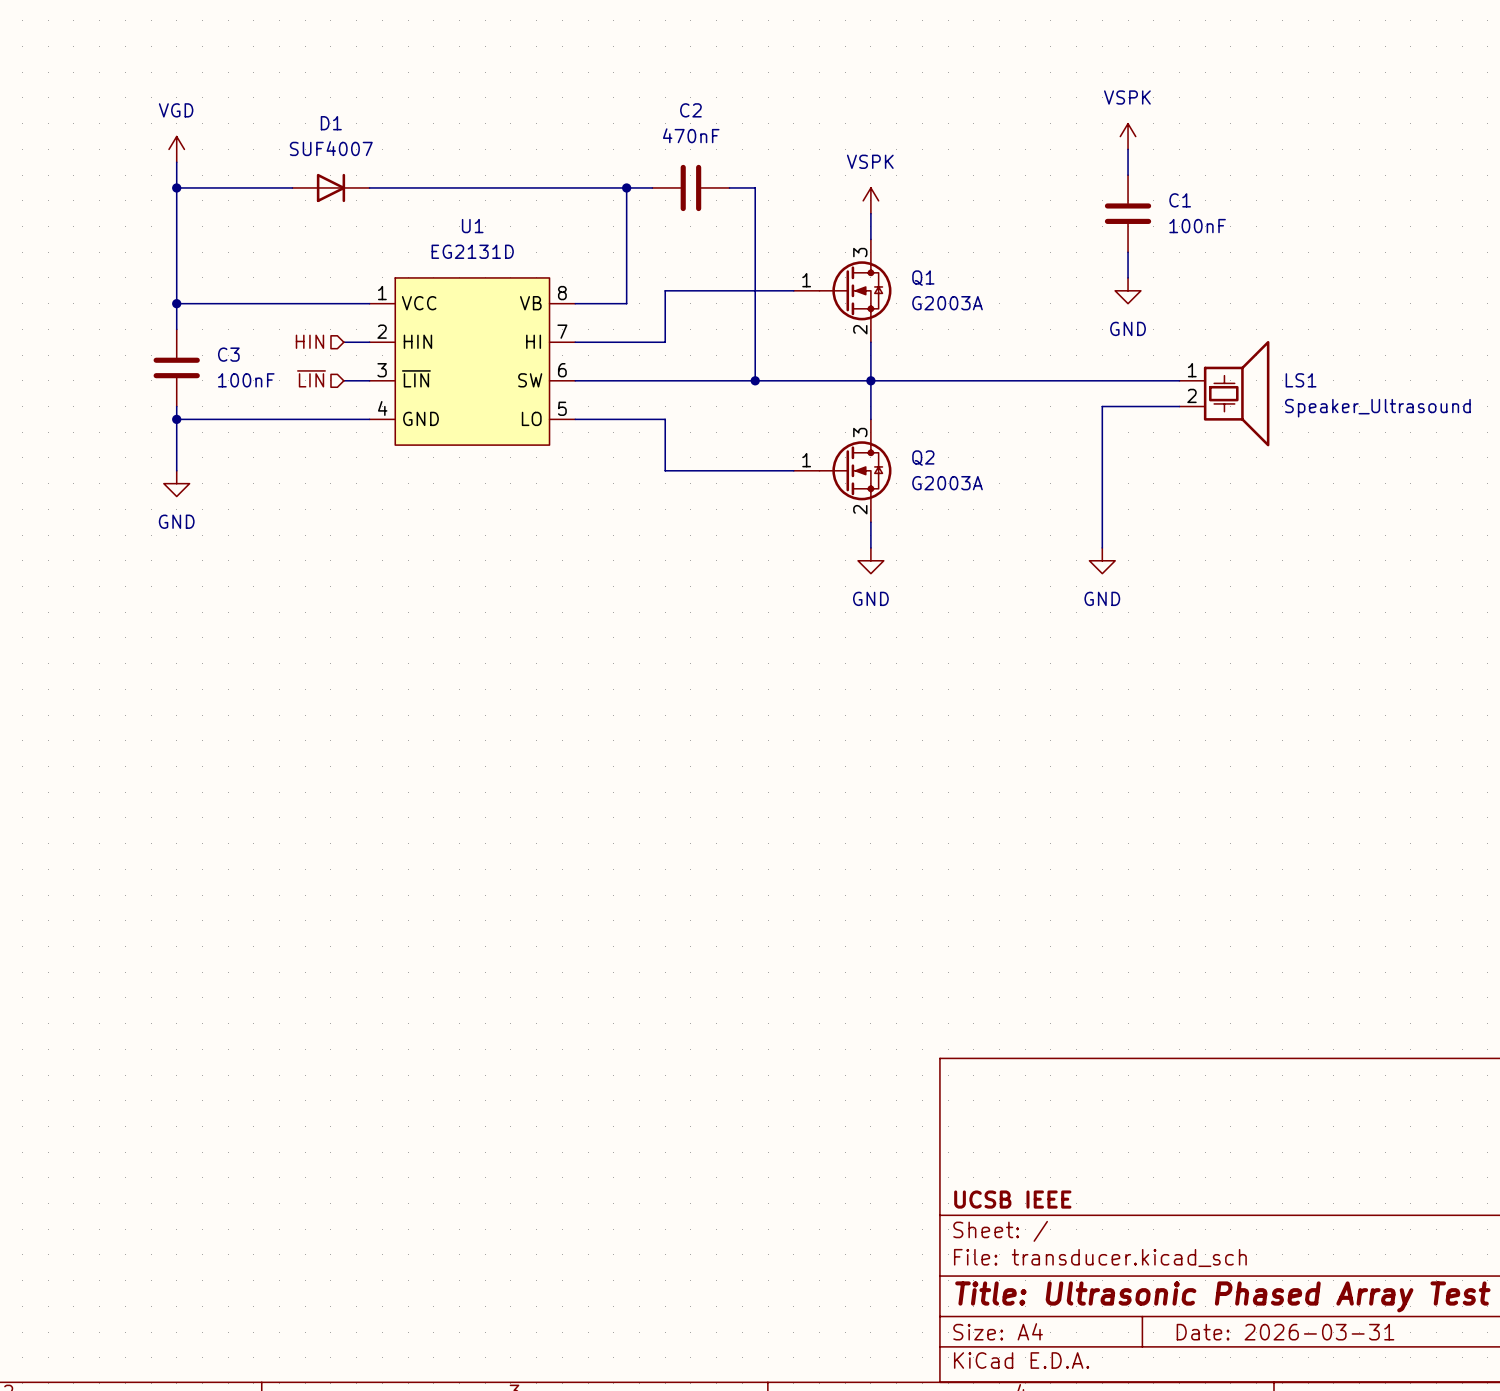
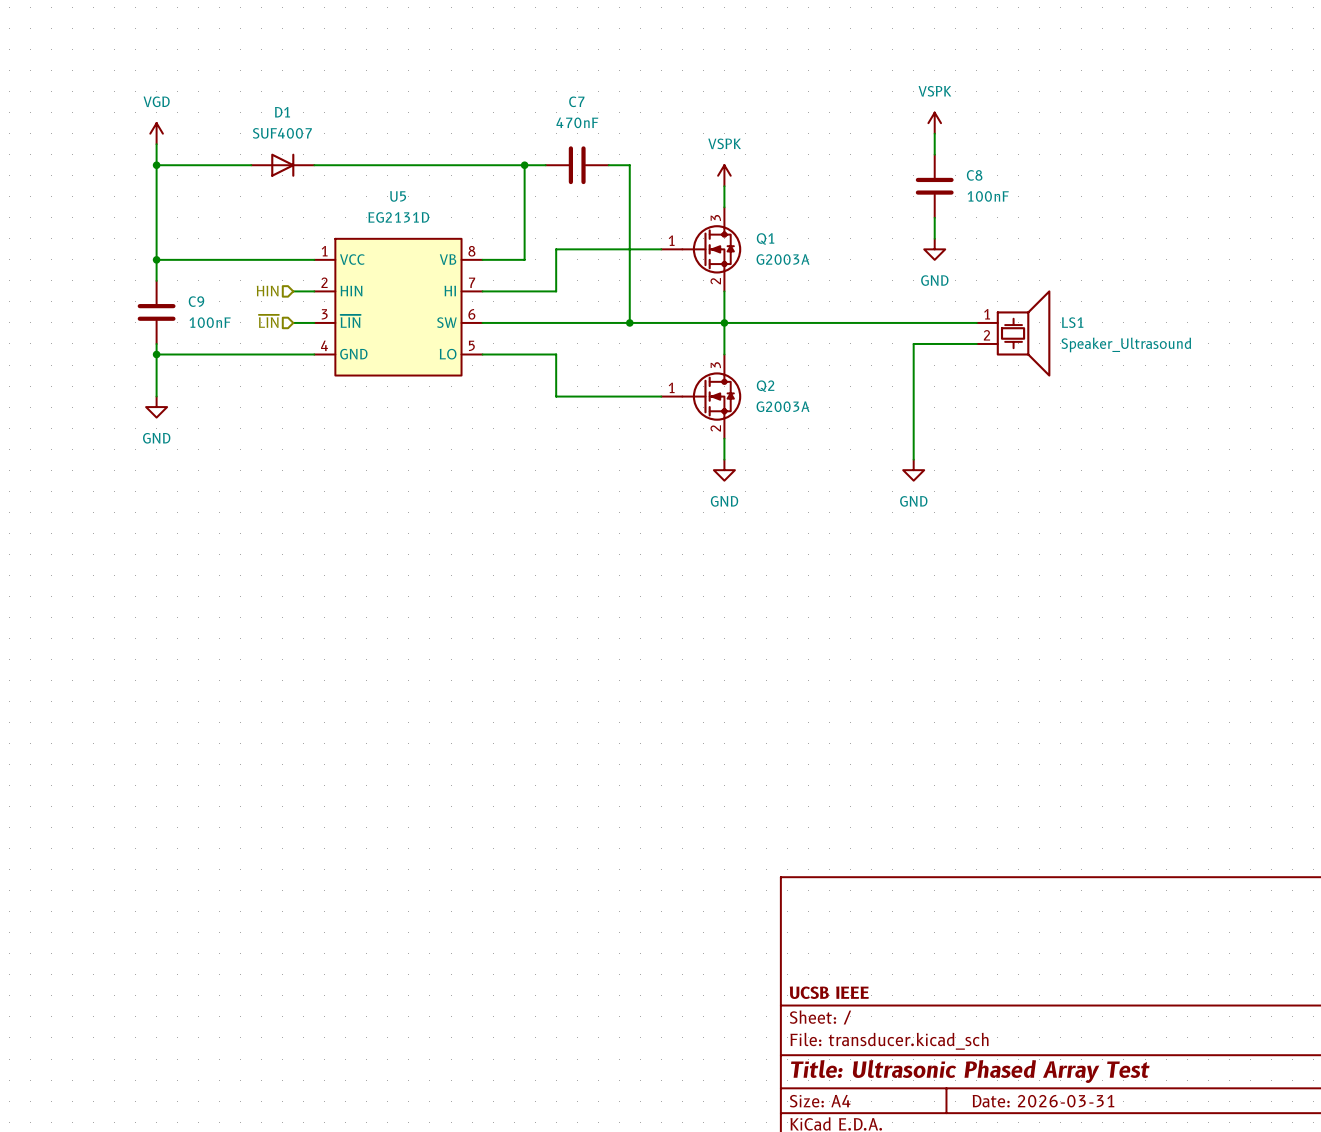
C2 name: C2 (690, 110) -> C7 (576, 101)
C1 name: C1 (1180, 200) -> C8 (974, 175)
U1 name: U1 (472, 226) -> U5 (398, 196)
C3 name: C3 (228, 354) -> C9 (196, 301)

